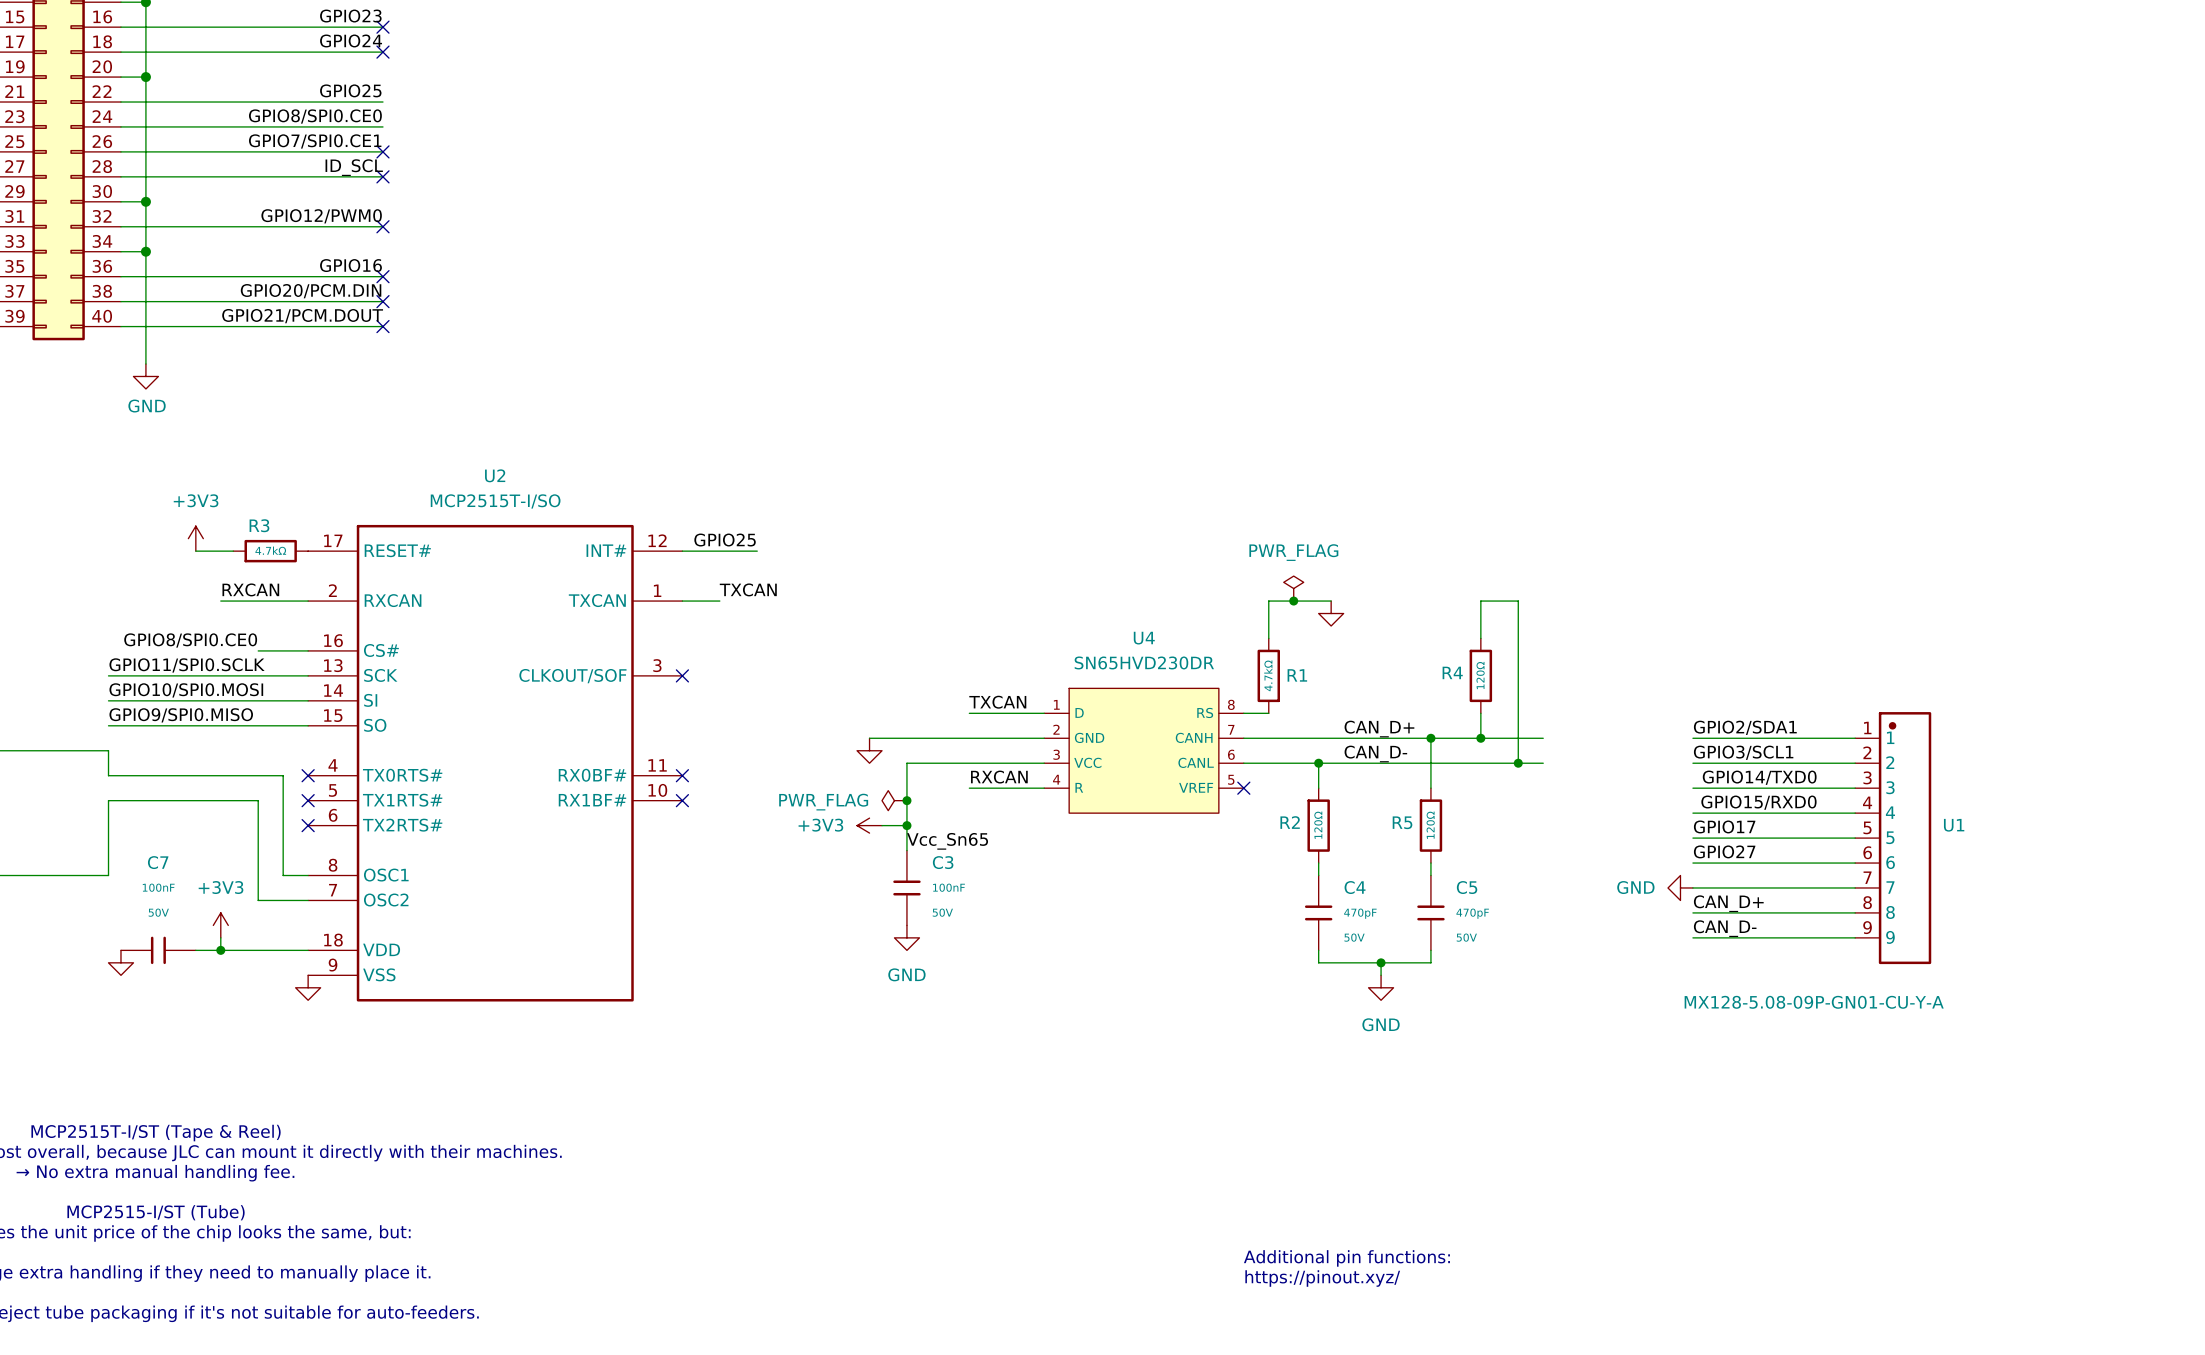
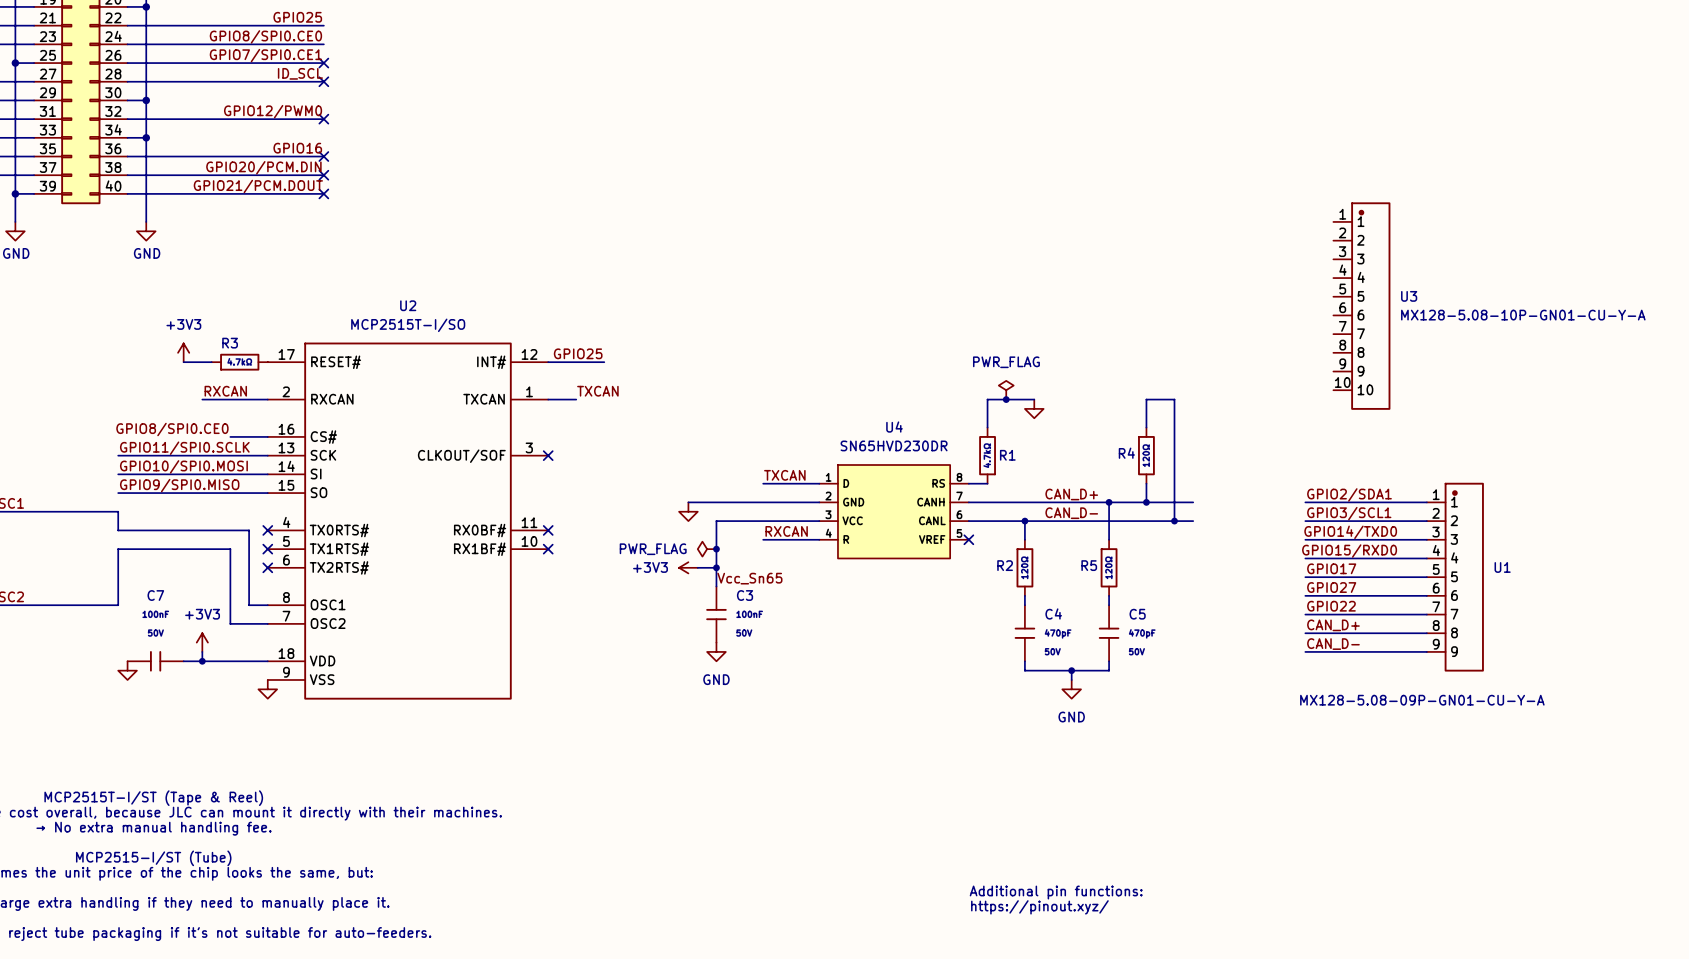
U3: none -> MX128-5.08-10P-GN01-CU-Y-A (1361, 306)
label: none -> GPIO22 (1331, 606)
power symbol: GND (1680, 887) -> none

